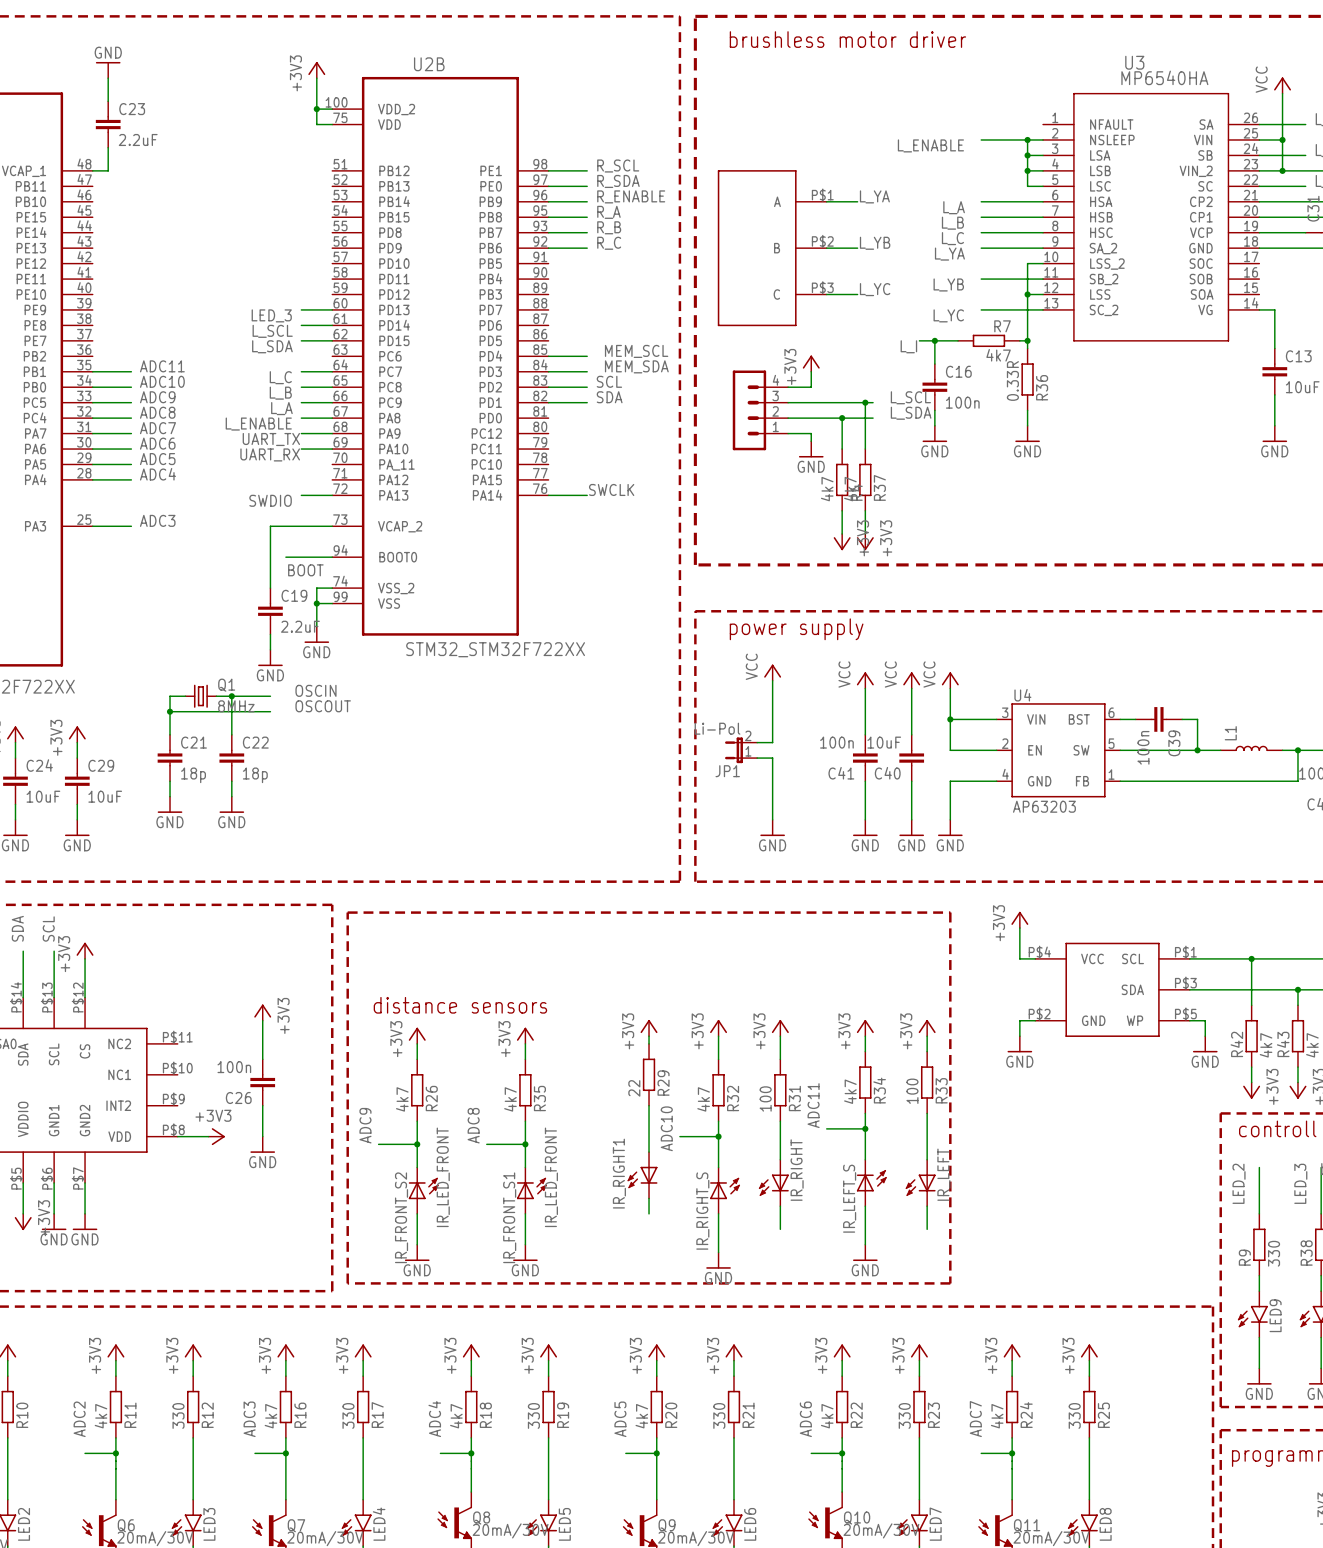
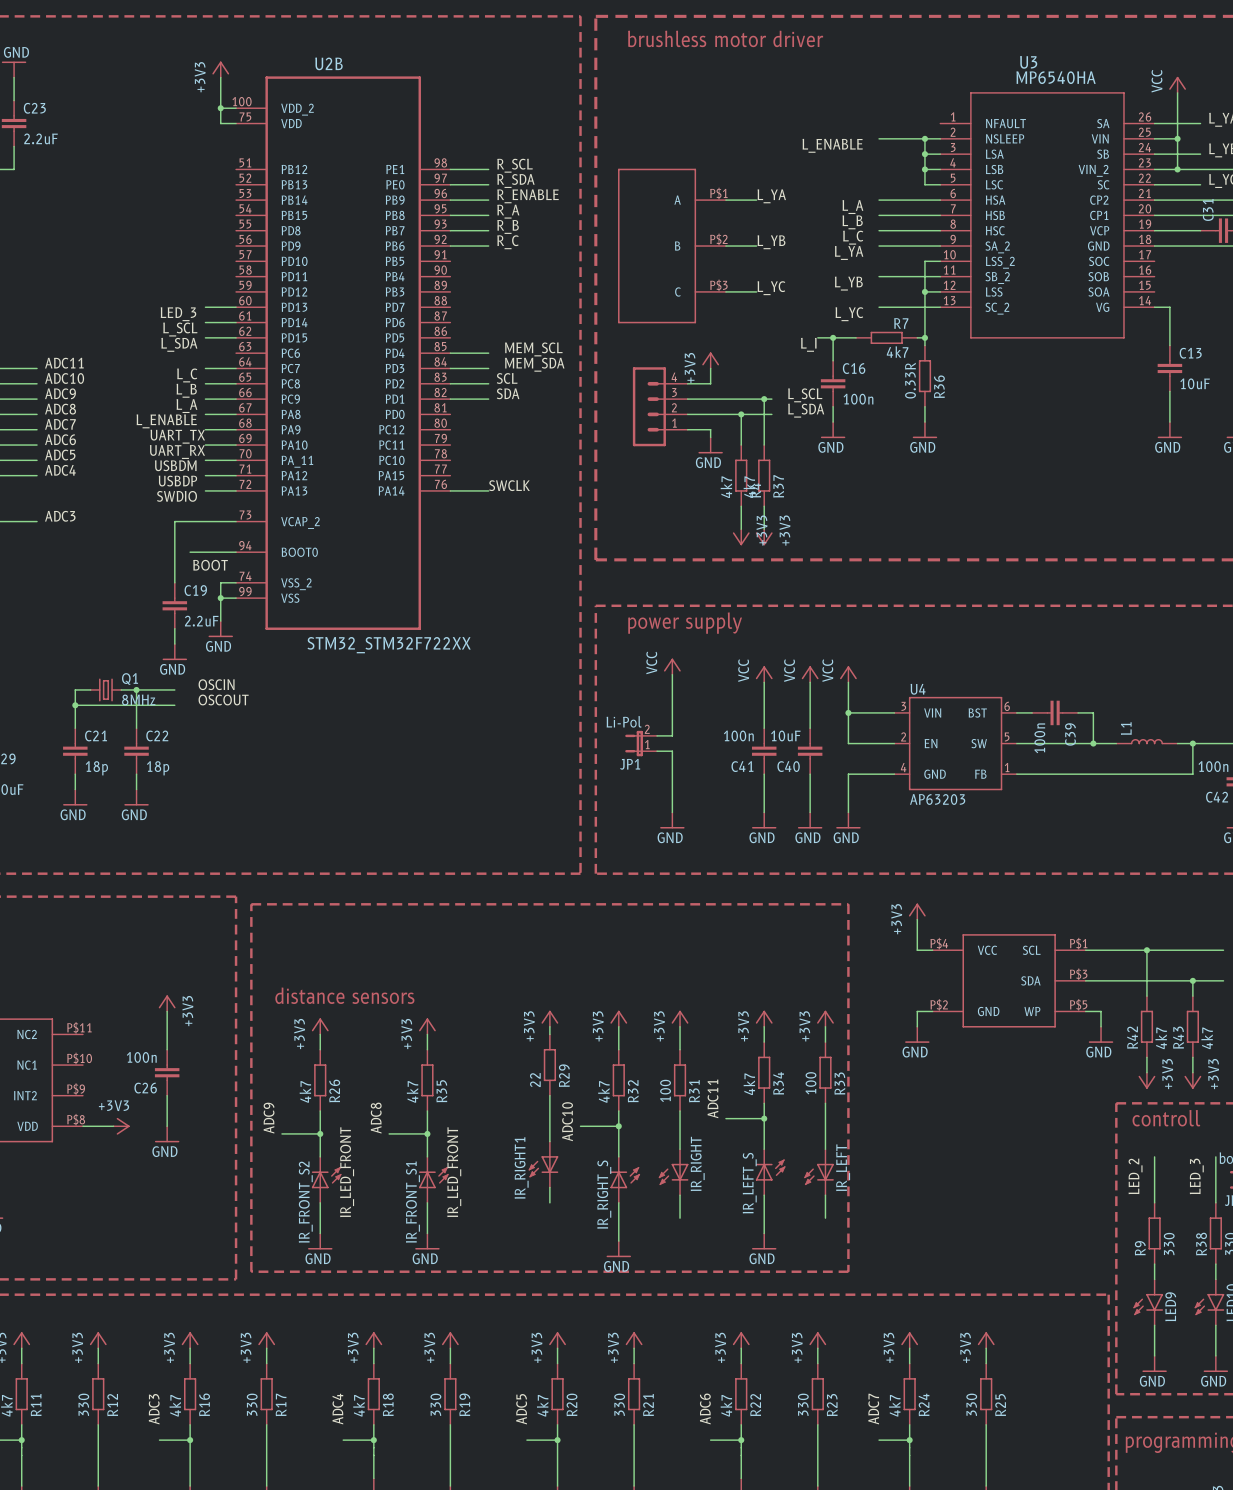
wire: none -> (205, 460) (236, 460)
label: none -> USBDM (175, 465)
wire: none -> (205, 475) (236, 475)
label: none -> USBDP (177, 481)

